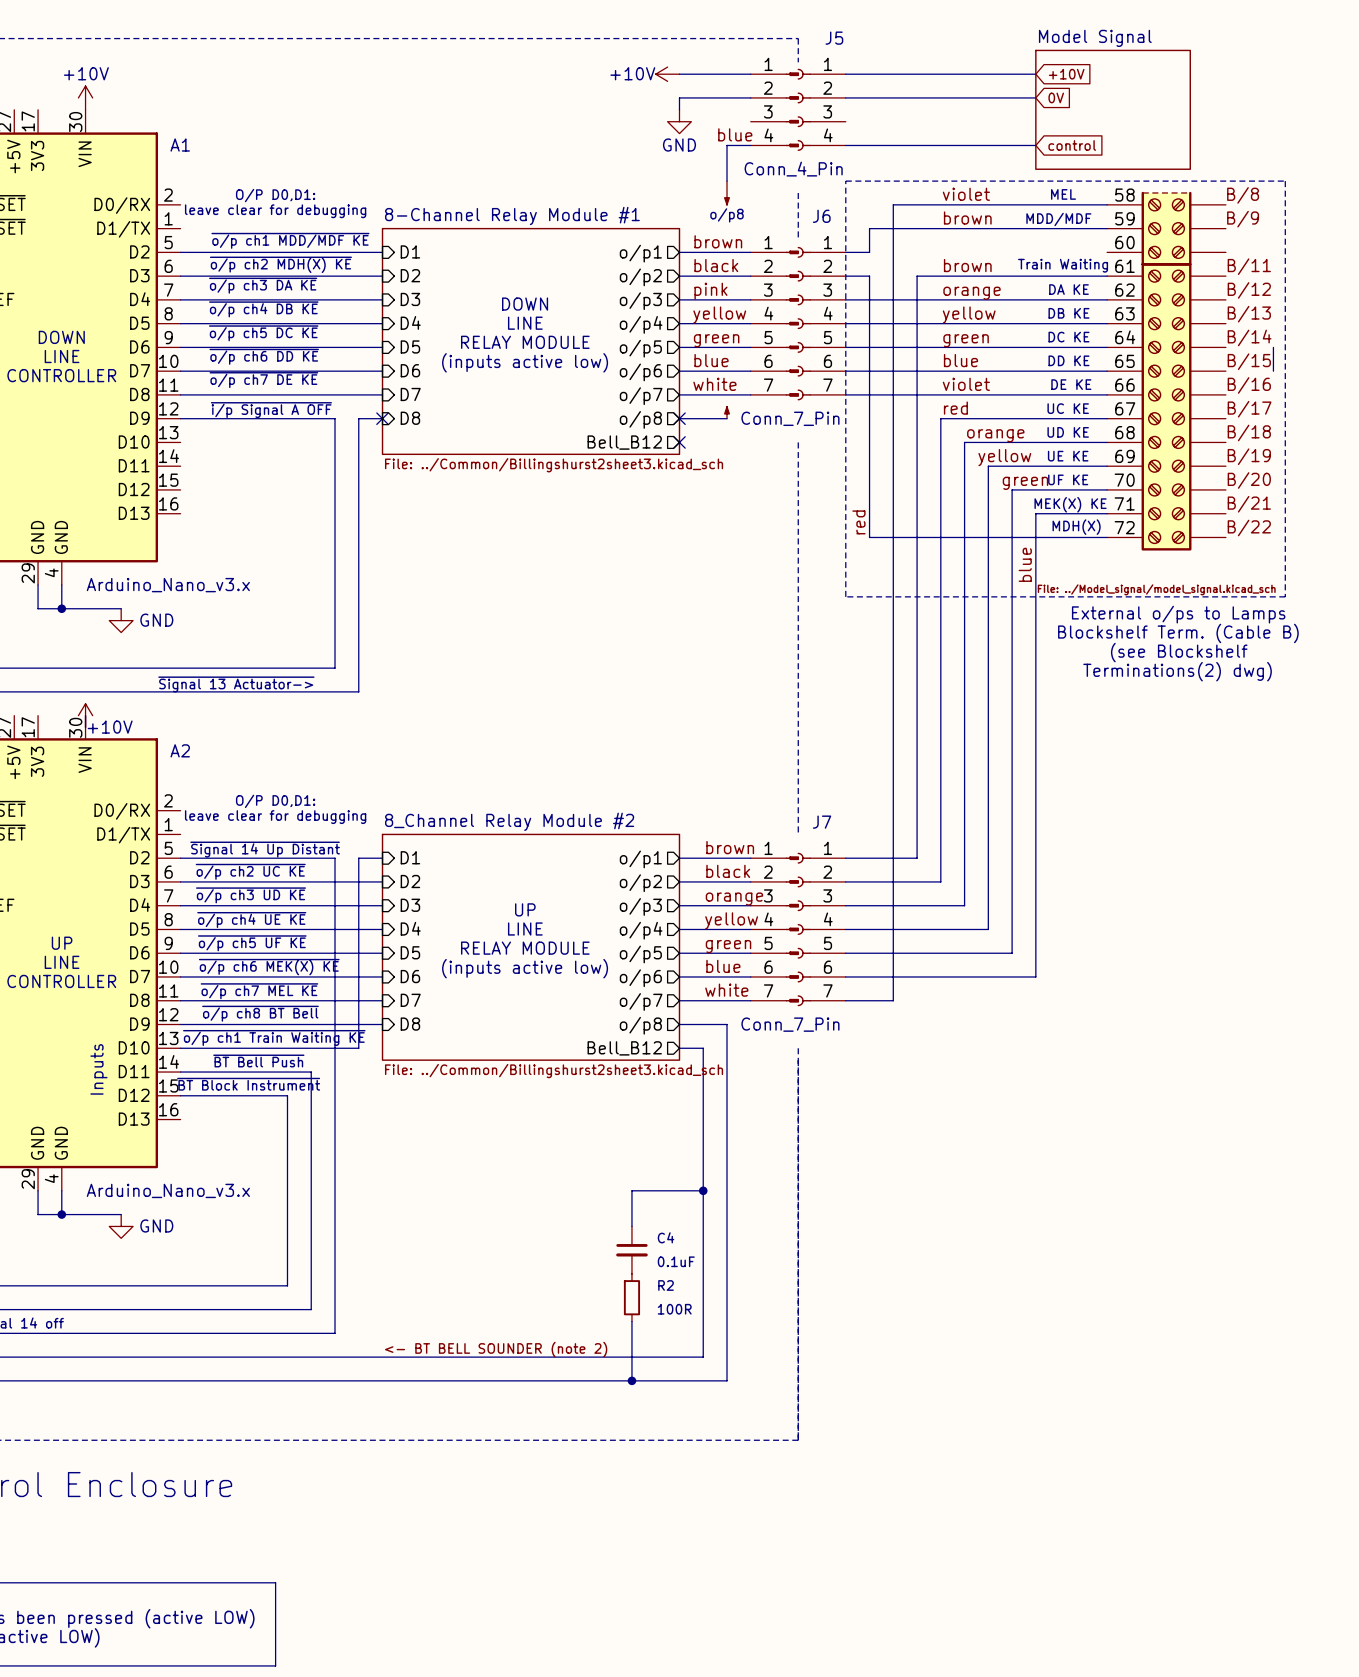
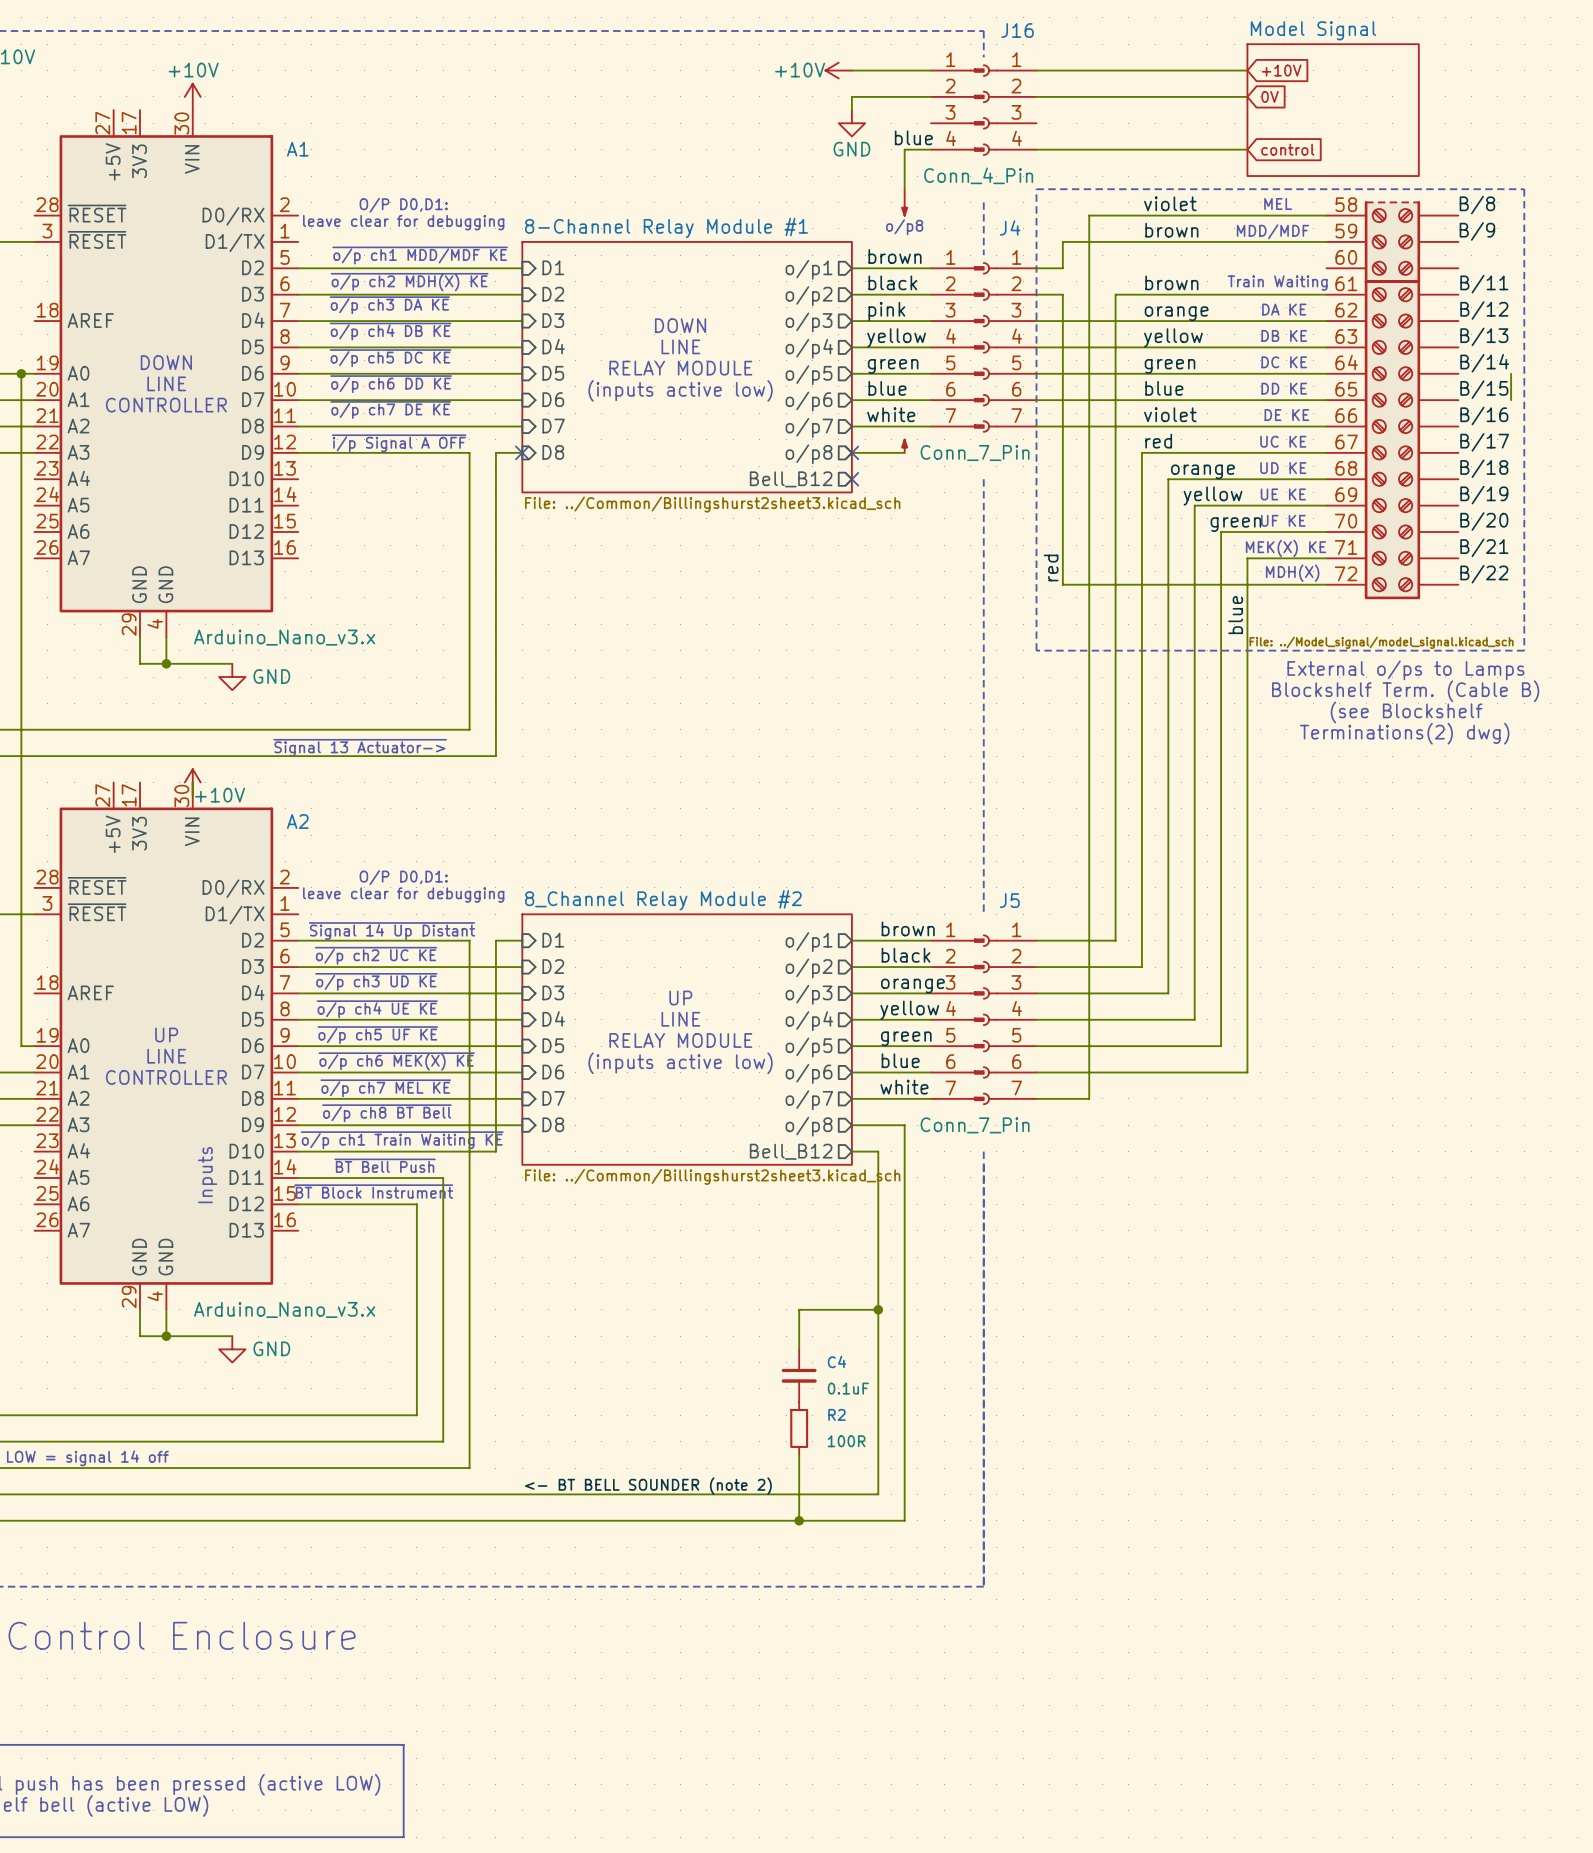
J5 name: J5 (834, 38) -> J16 (1017, 30)
J6 name: J6 (821, 216) -> J4 (1010, 227)
J7 name: J7 (822, 822) -> J5 (1009, 900)

